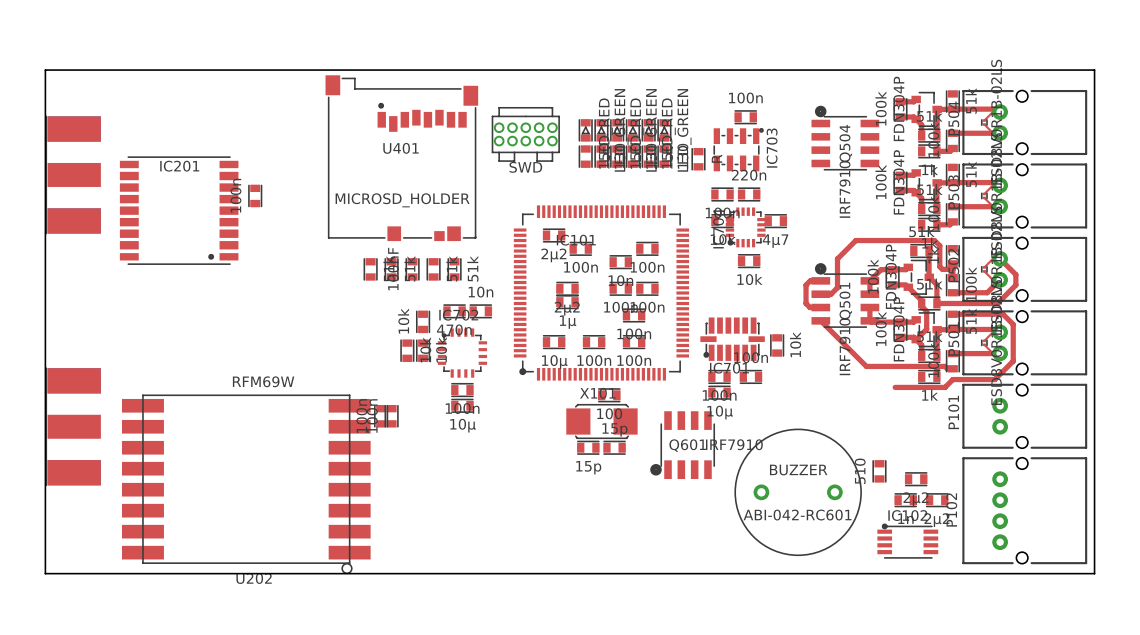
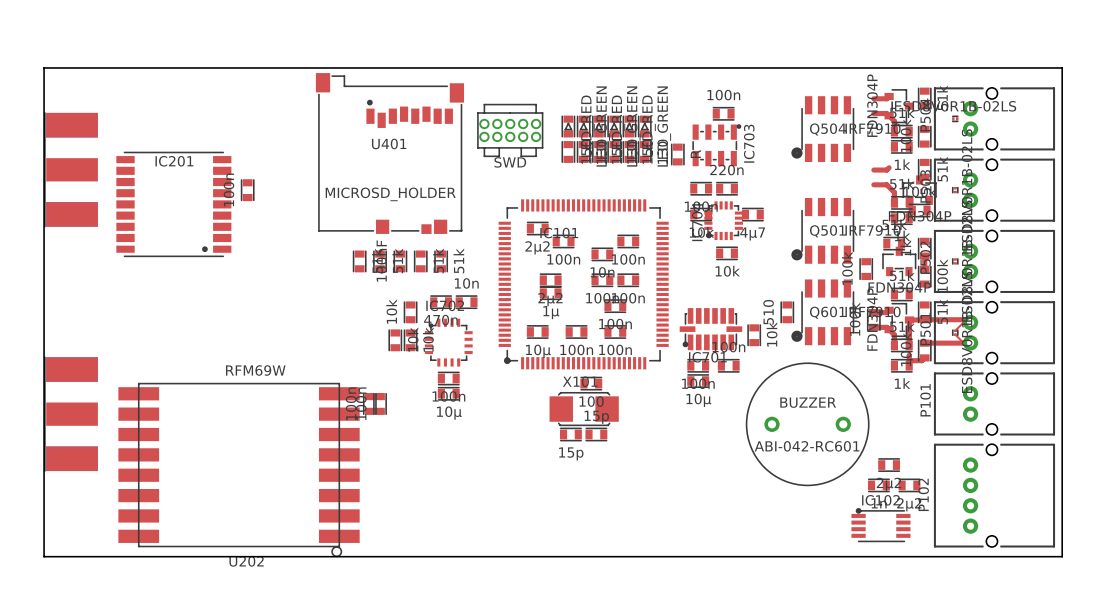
part: 100k (900, 109) -> none
top track: (984, 120) (992, 112) (1000, 112) (997, 109) (937, 109) (936, 135) -> none
part rotation: 0° (984, 122) -> 90° clockwise (955, 118)
top track: (984, 124) (992, 133) (1000, 133) (952, 133) -> none
Q504 rotation: 0° (845, 138) -> 90° counterclockwise (822, 129)
top track: (952, 148) (950, 151) (936, 151) -> none
part: 100k (900, 182) -> none
part rotation: 0° (926, 182) -> 90° counterclockwise (919, 190)
part position: (926, 182) -> (919, 190)
top track: (984, 193) (992, 185) (1000, 185) (997, 182) (937, 182) (936, 209) -> none
top track: (984, 197) (992, 206) (1000, 206) (952, 206) -> none
part rotation: 0° (952, 214) -> 90° clockwise (919, 210)
top track: (952, 221) (950, 224) (936, 224) -> none
top track: (929, 251) (929, 277) (936, 284) (936, 303) (997, 303) (1015, 285) (1015, 274) (997, 256) -> none
top track: (1000, 258) (992, 258) (984, 267) -> none
top track: (908, 267) (905, 269) (881, 269) (869, 280) (869, 294) -> none
top track: (952, 269) (942, 269) (939, 266) (939, 245) (934, 240) (855, 240) (837, 258) (837, 287) (831, 294) (820, 294) -> none
top track: (984, 271) (992, 279) (1000, 279) (987, 292) (952, 292) -> none
part rotation: 0° (918, 277) -> 90° counterclockwise (899, 261)
top track: (820, 280) (810, 280) (806, 285) (806, 303) (810, 307) (820, 307) -> none
top track: (892, 284) (905, 284) -> none
top track: (908, 287) (921, 300) (921, 306) (926, 311) (926, 329) (916, 339) -> none
Q501 rotation: 0° (845, 295) -> 90° counterclockwise (822, 230)
Q501 position: (845, 295) -> (822, 230)
top track: (869, 307) (871, 322) (897, 322) -> none
top track: (952, 314) (1003, 314) (1013, 324) (1013, 361) (994, 379) (952, 379) (945, 387) (895, 387) -> none
top track: (820, 320) (866, 366) (945, 366) (947, 368) (952, 368) -> (909, 360) (921, 360) (924, 357)
Q601 position: (682, 445) -> (822, 312)
part position: (879, 471) -> (787, 312)
ABI-042-RC601 position: (798, 492) -> (807, 424)

